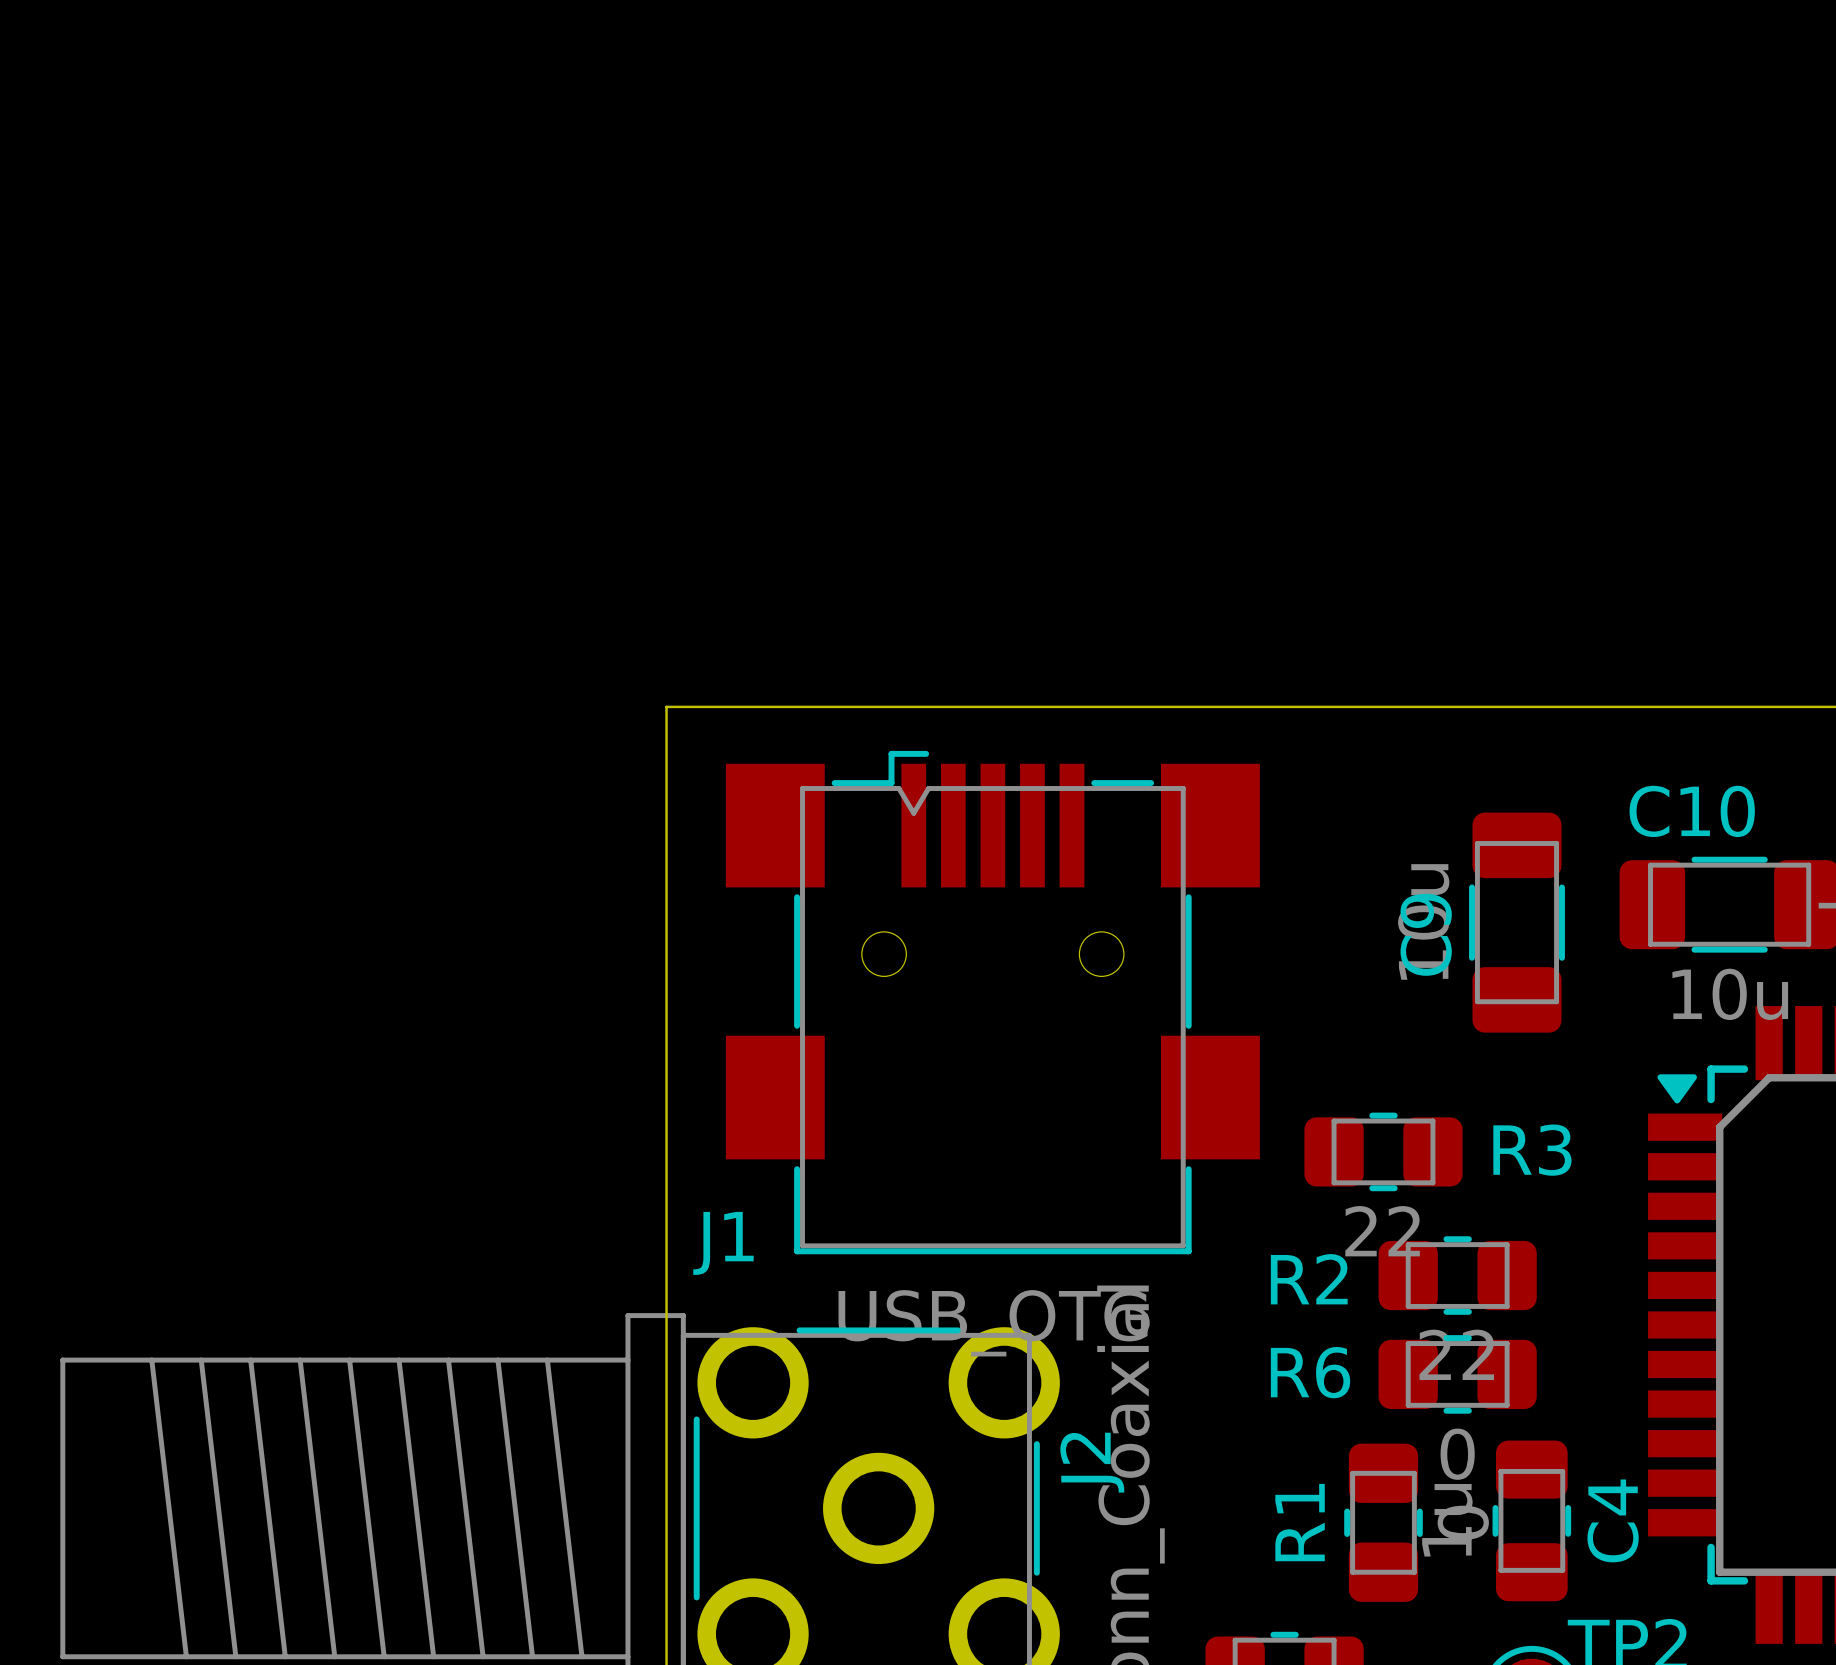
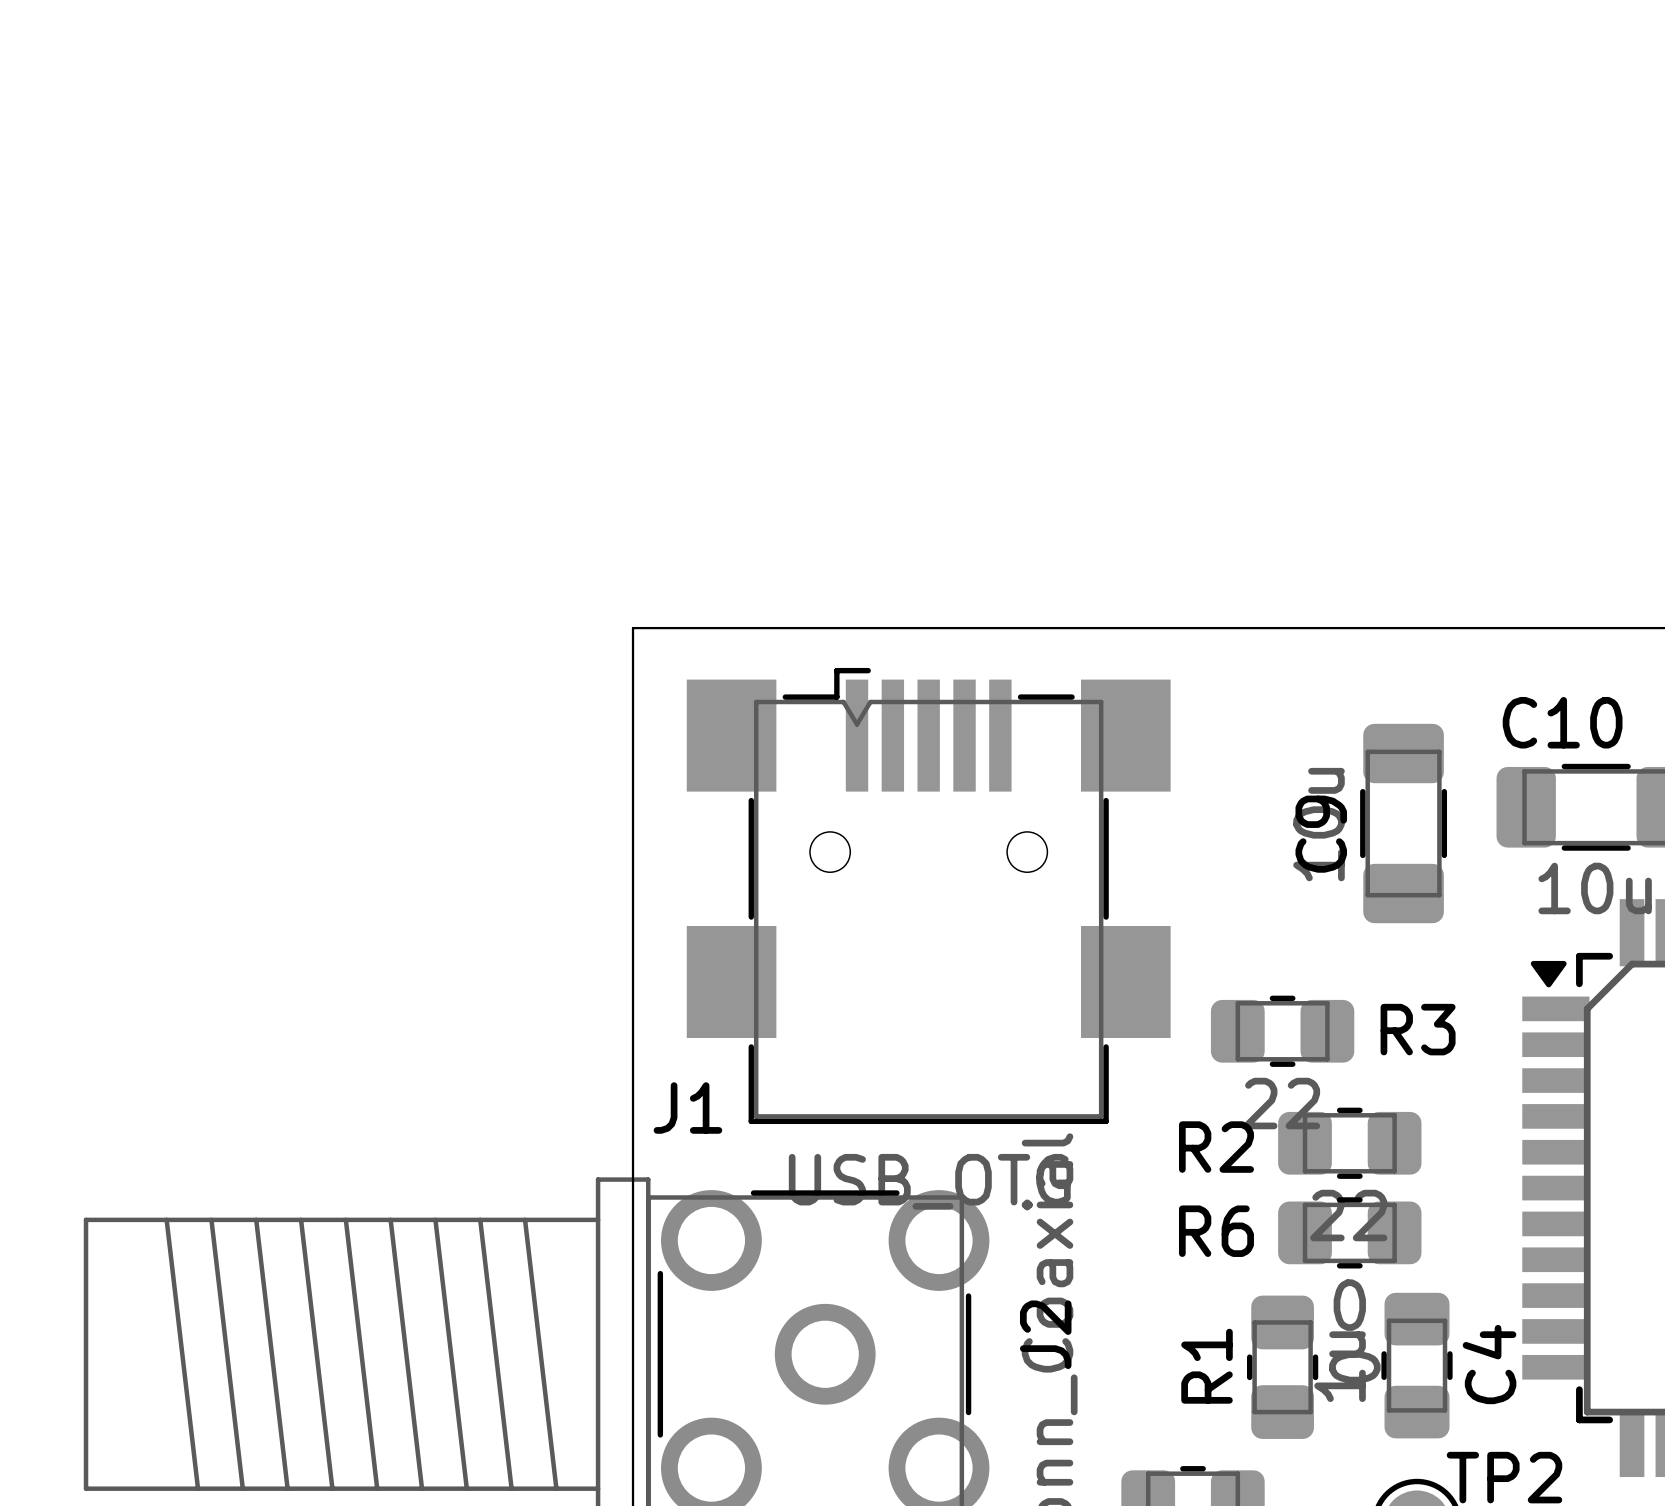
J2 name position: J2 (1092, 1462) -> J2 (1045, 1334)

